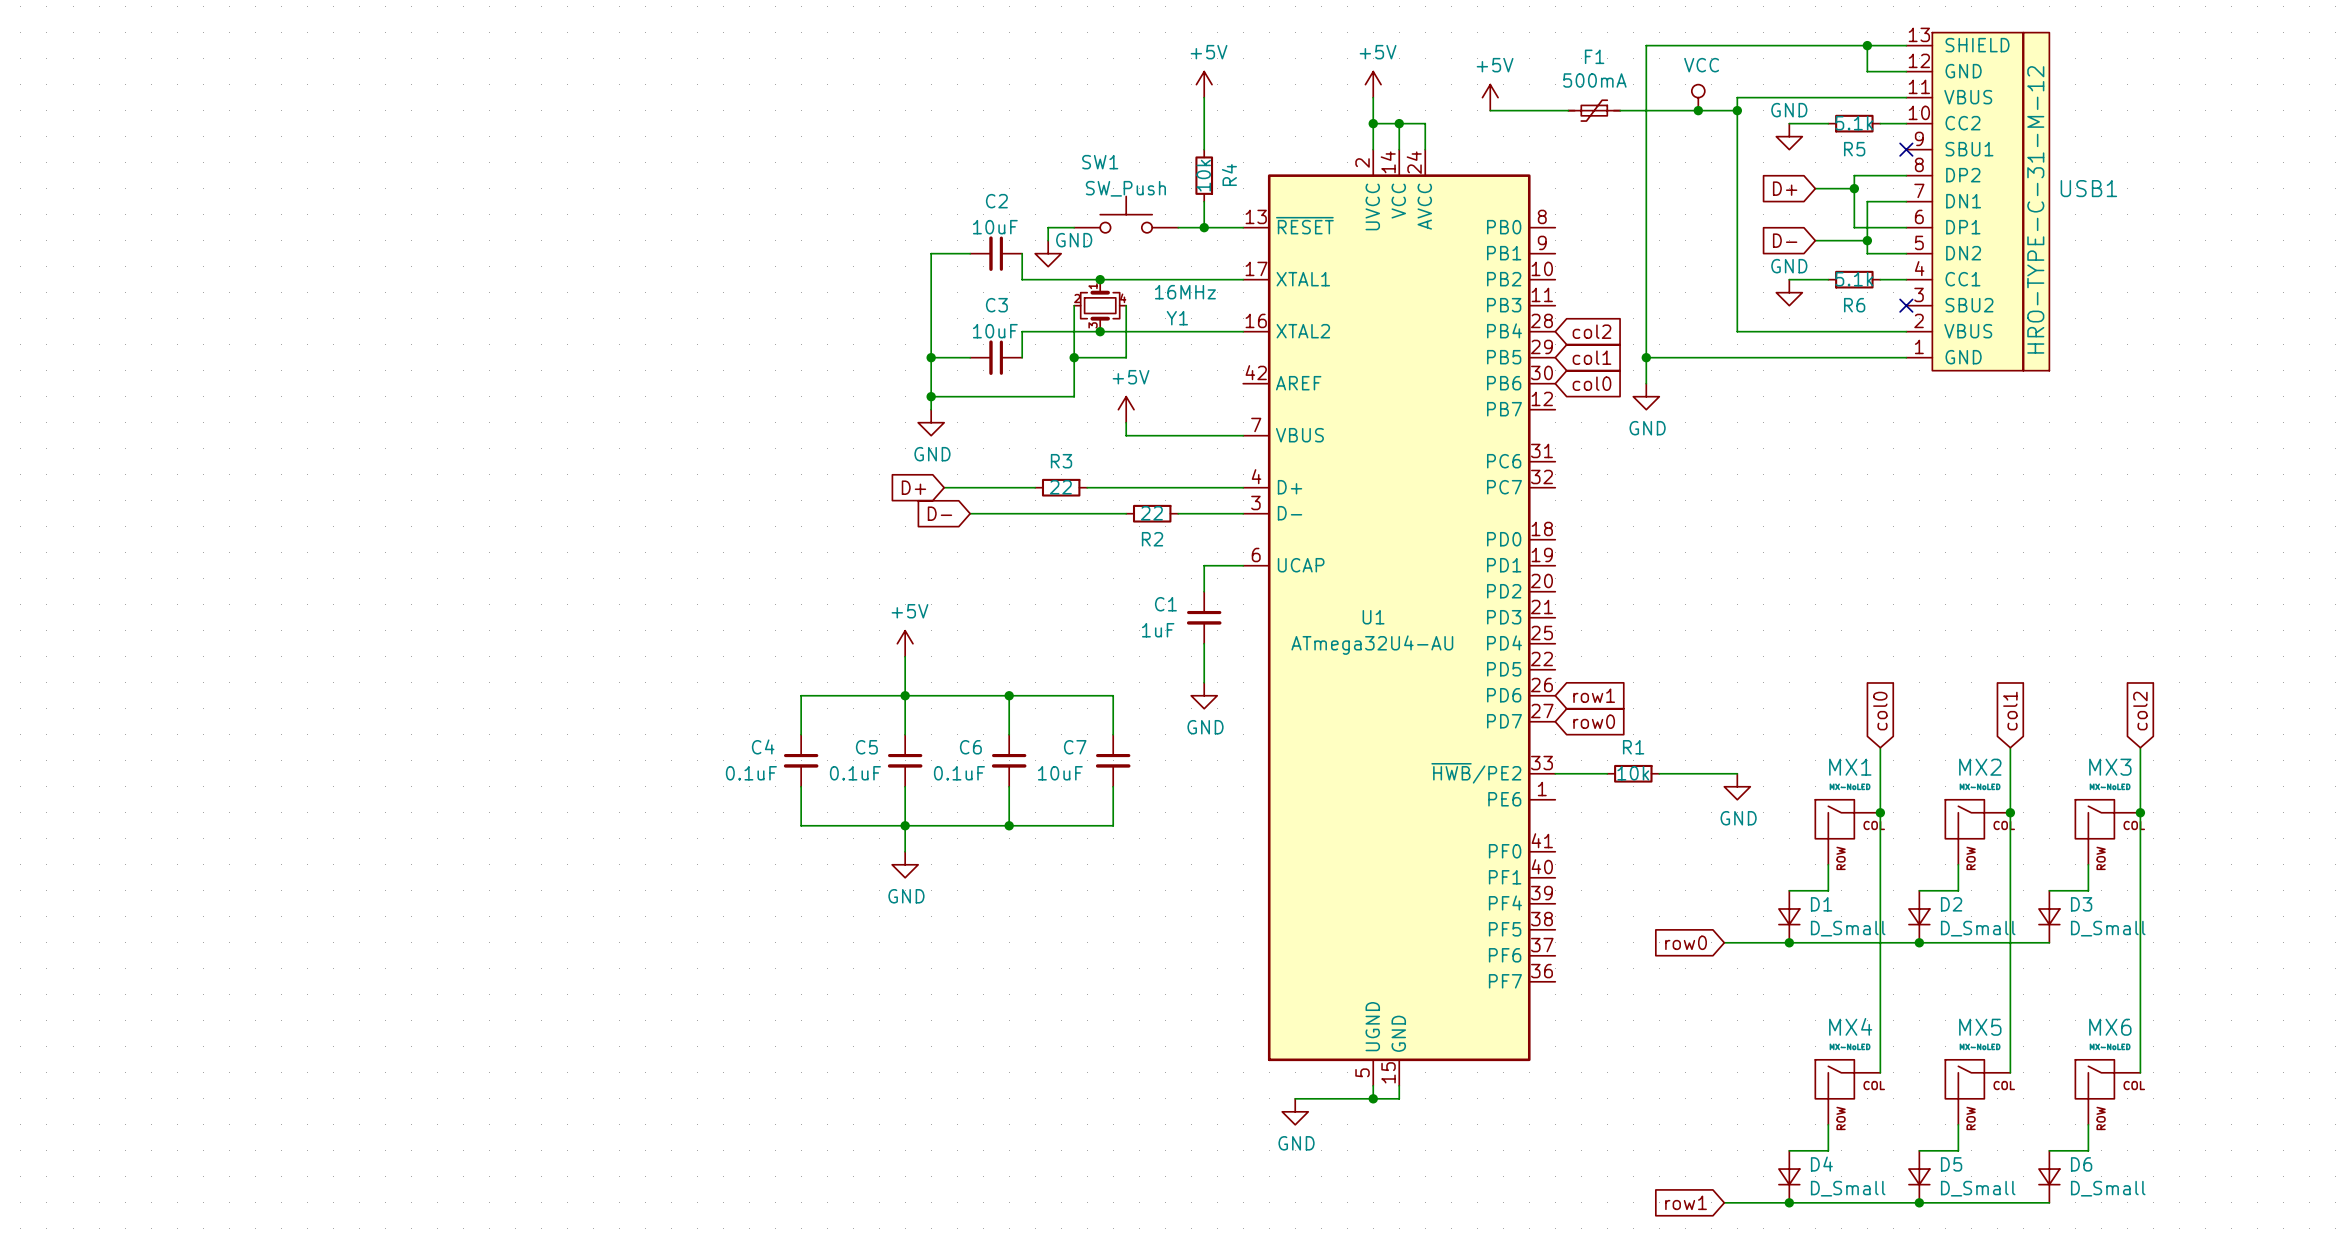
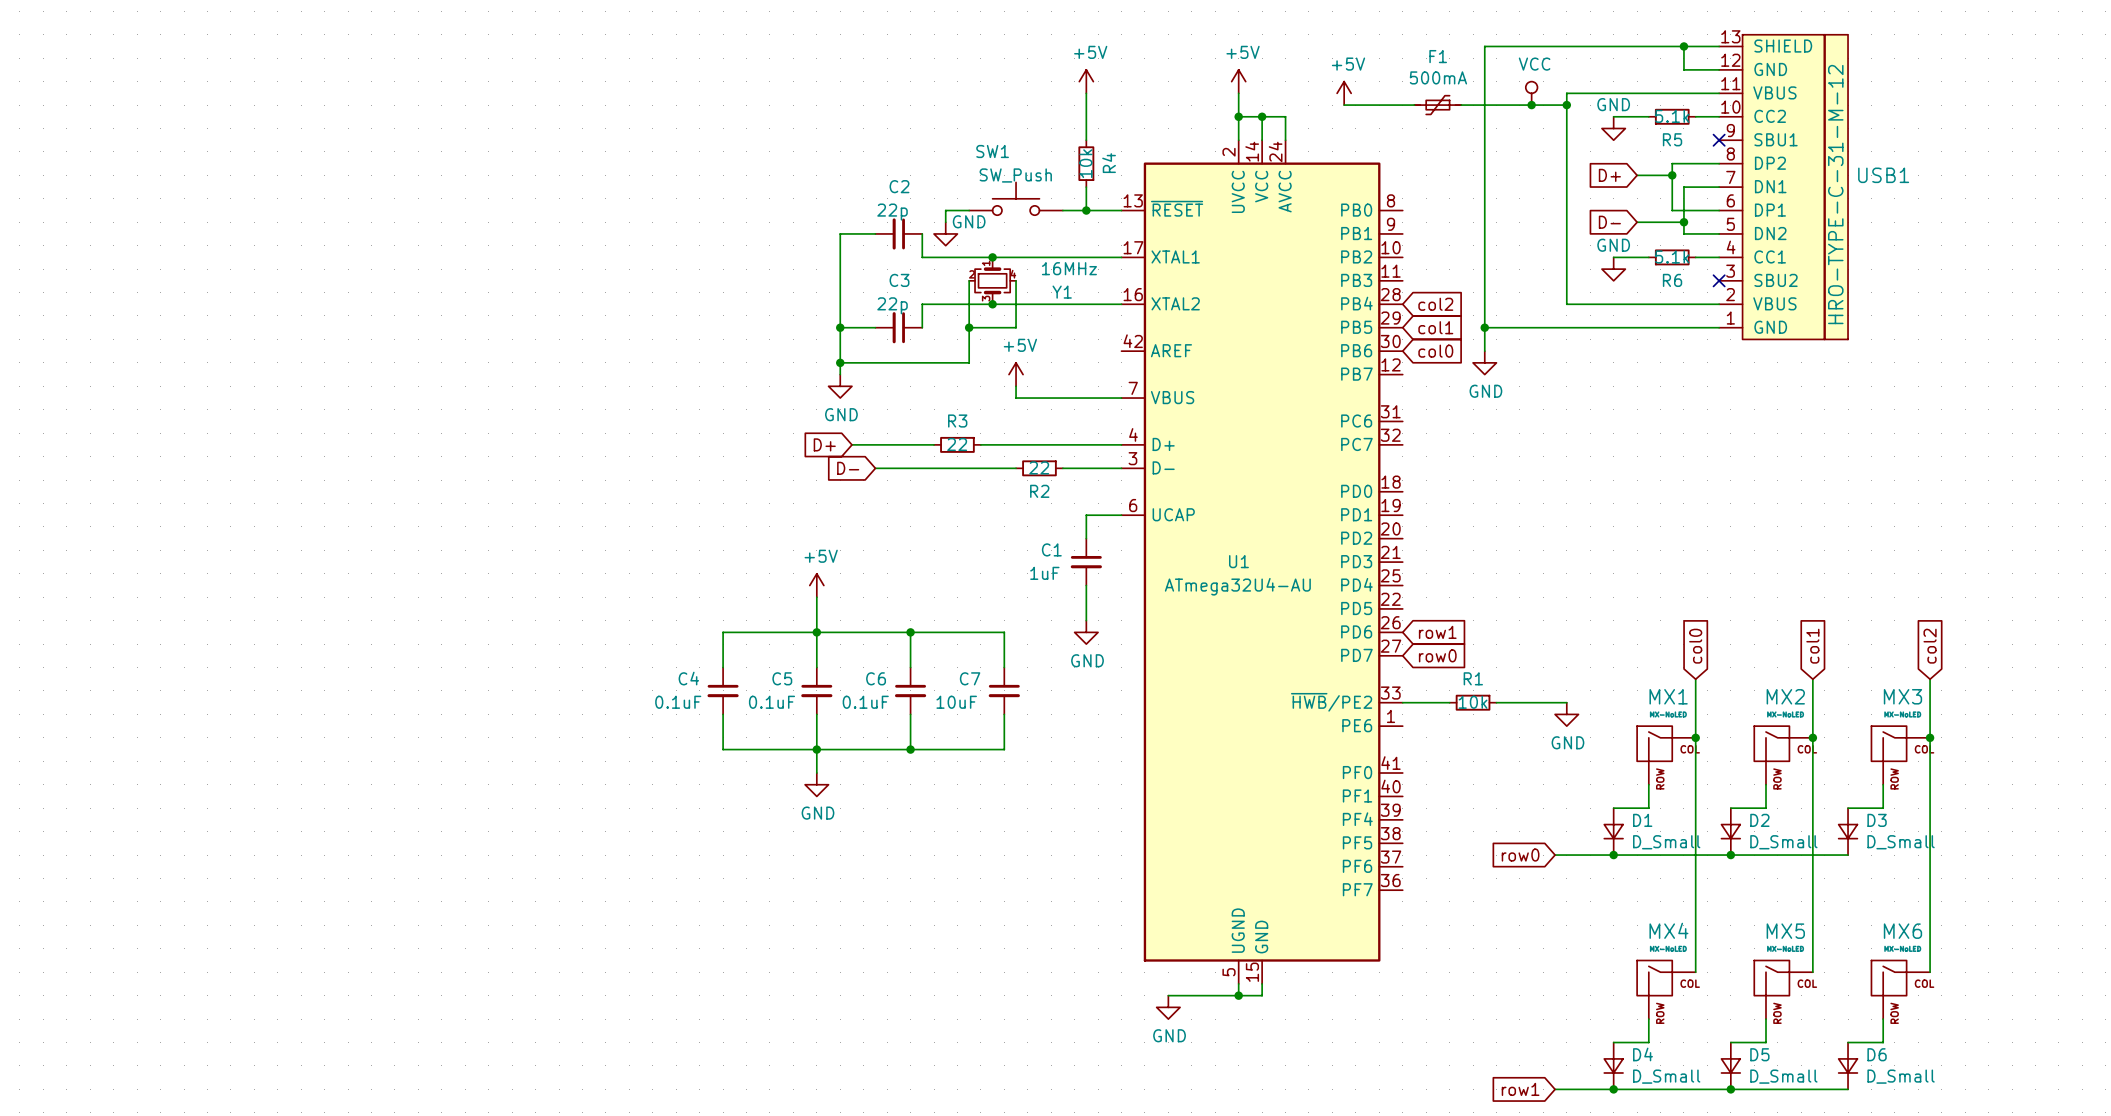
C2 value: 10uF (995, 227) -> 22p (892, 212)
C3 value: 10uF (995, 331) -> 22p (892, 305)

